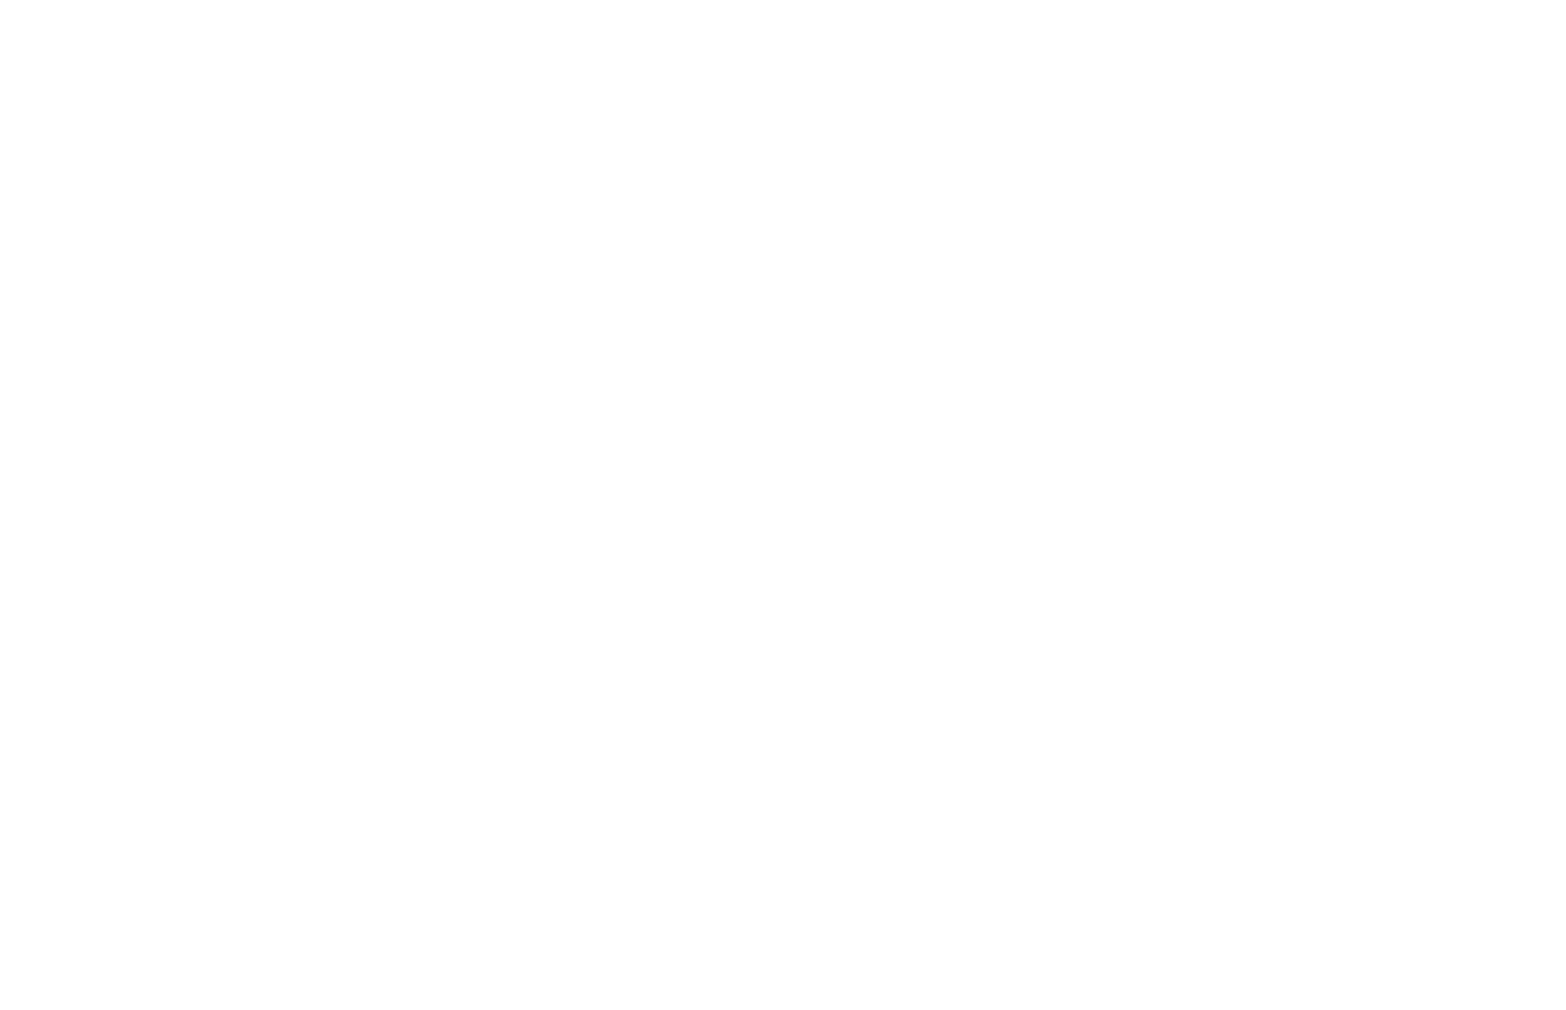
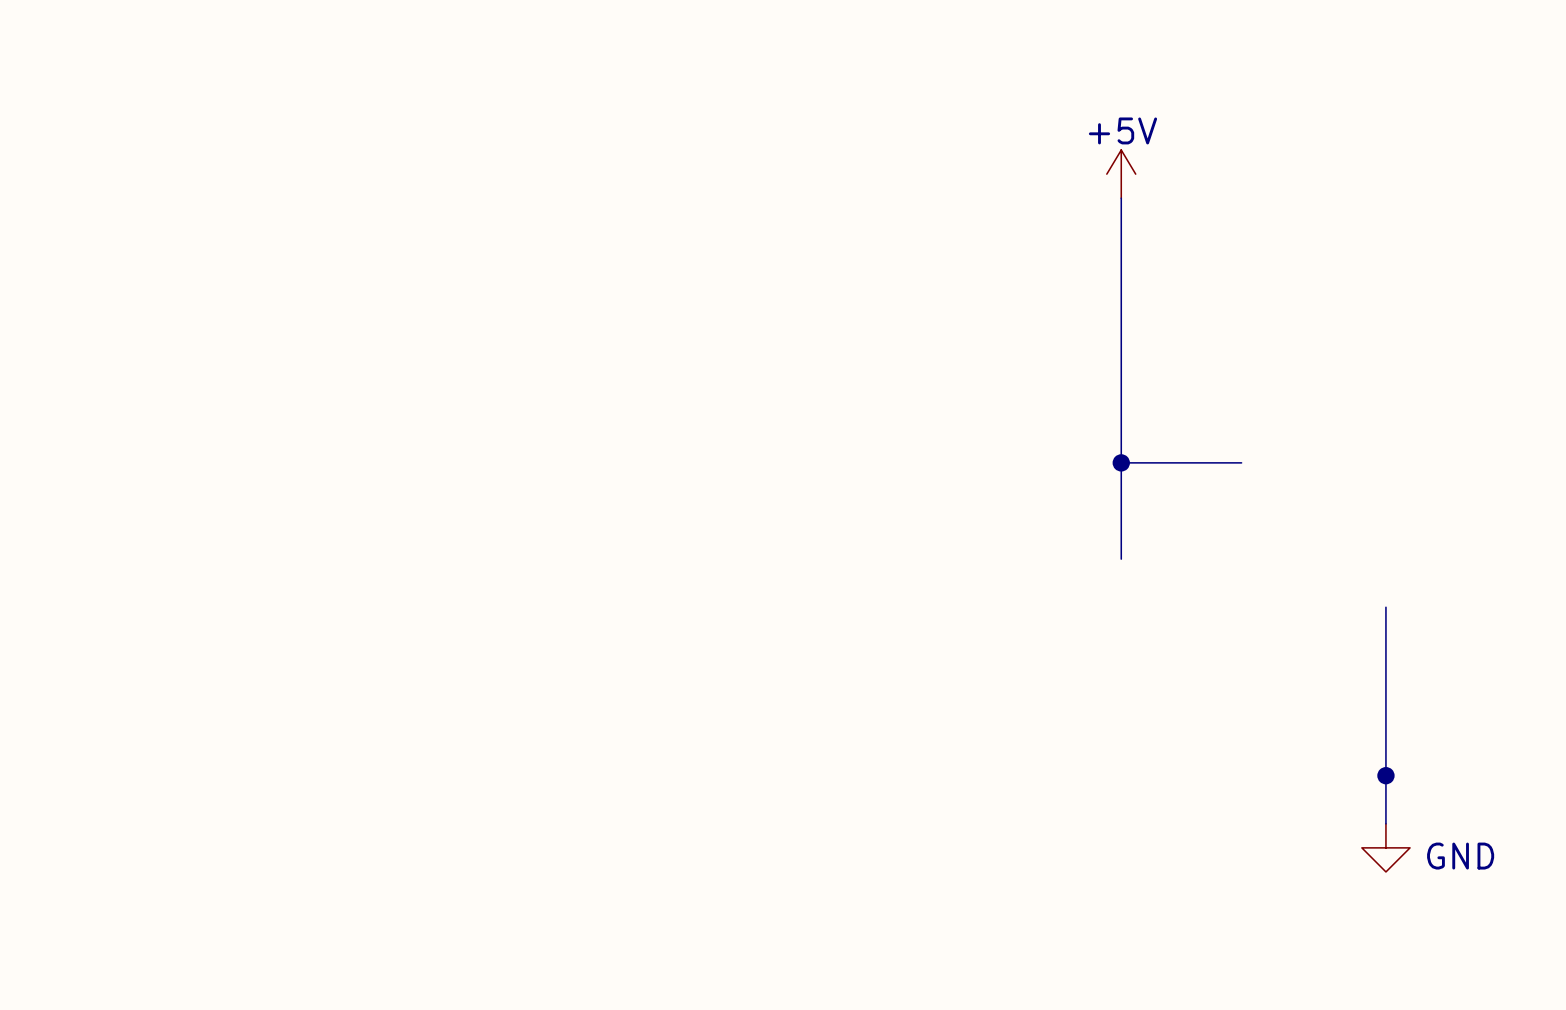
power symbol: none -> +5V (1121, 174)
wire: none -> (1121, 198) (1121, 559)
wire: none -> (1121, 462) (1241, 462)
junction: none -> (1121, 462)
wire: none -> (1385, 607) (1385, 823)
junction: none -> (1385, 775)
power symbol: none -> GND (1385, 847)

